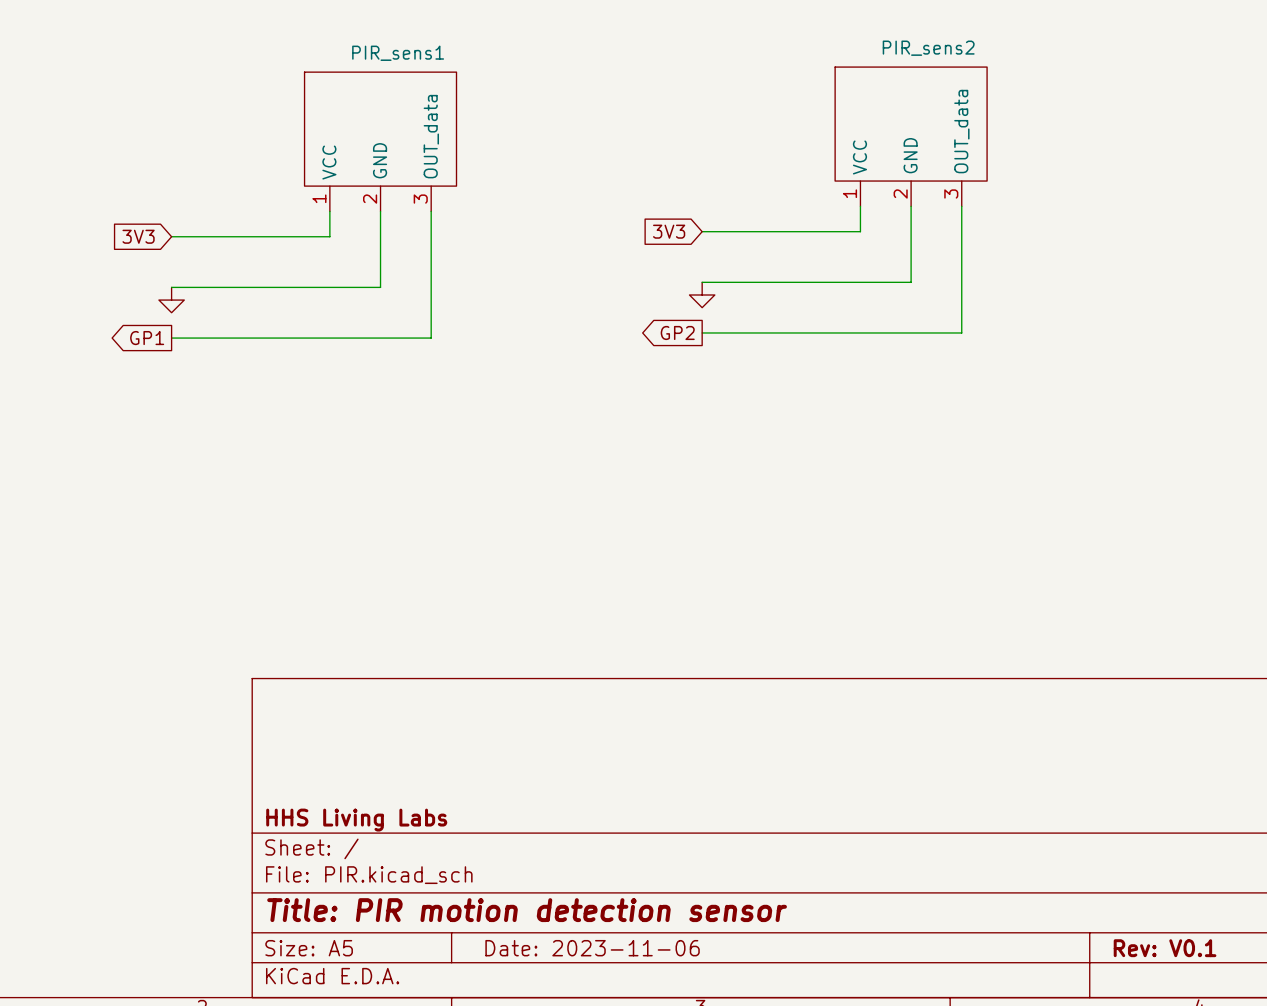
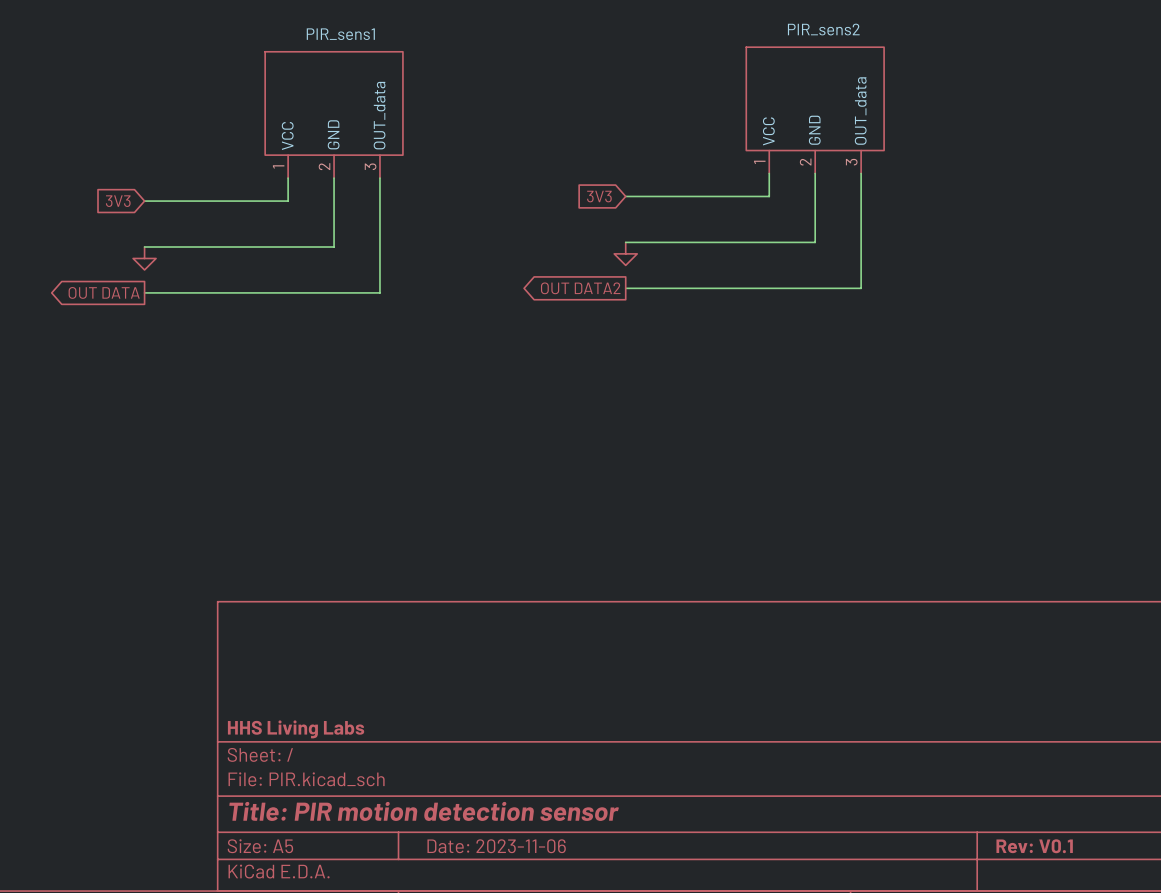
global label: GP2 (677, 332) -> OUT DATA2 (580, 288)
global label: GP1 (147, 338) -> OUT DATA (104, 292)

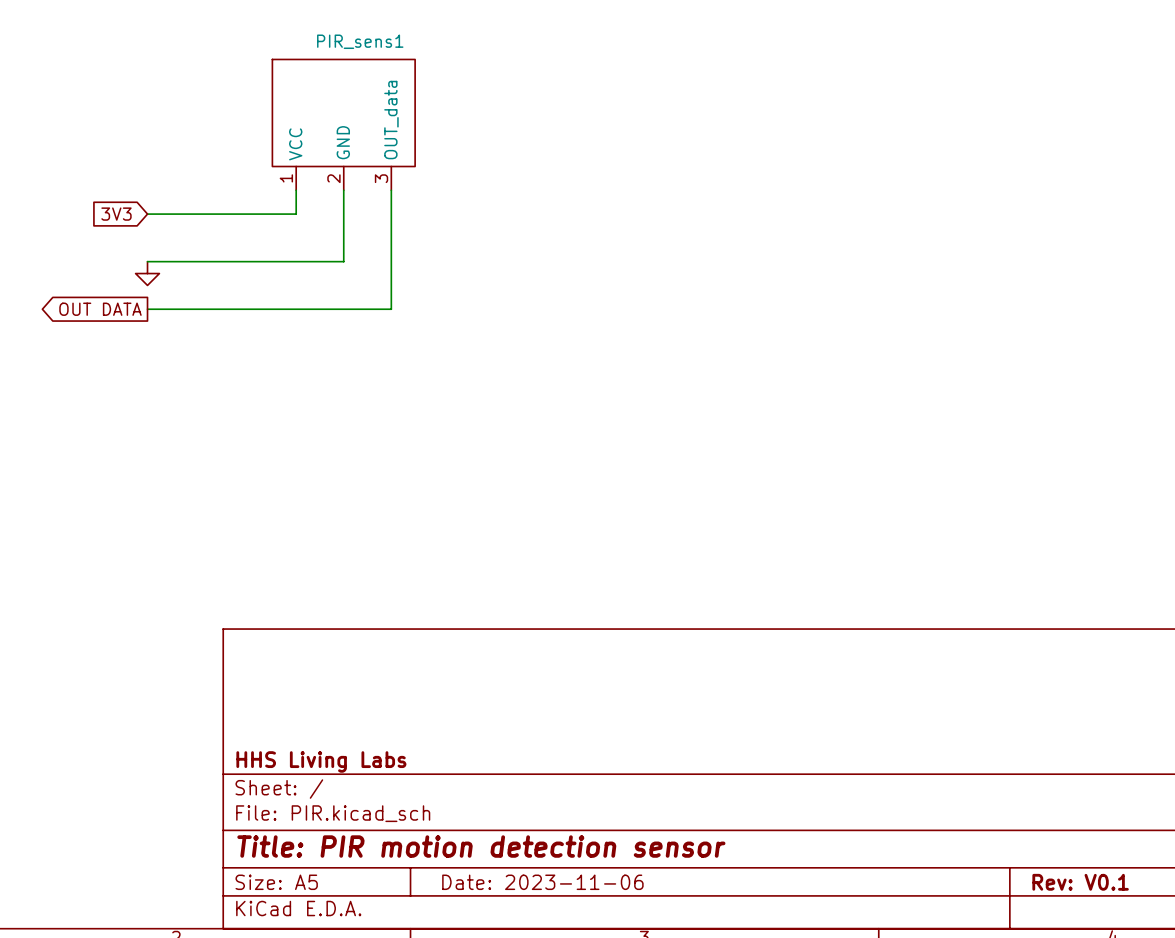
PIR_sens2: (815, 110) -> none
wire: (769, 173) (769, 196) (625, 196) -> none
wire: (815, 173) (815, 242) (625, 242) -> none
wire: (861, 173) (861, 288) (625, 288) -> none
global label: 3V3 (599, 196) -> none
power symbol: (625, 253) -> none
global label: OUT DATA2 (580, 288) -> none

